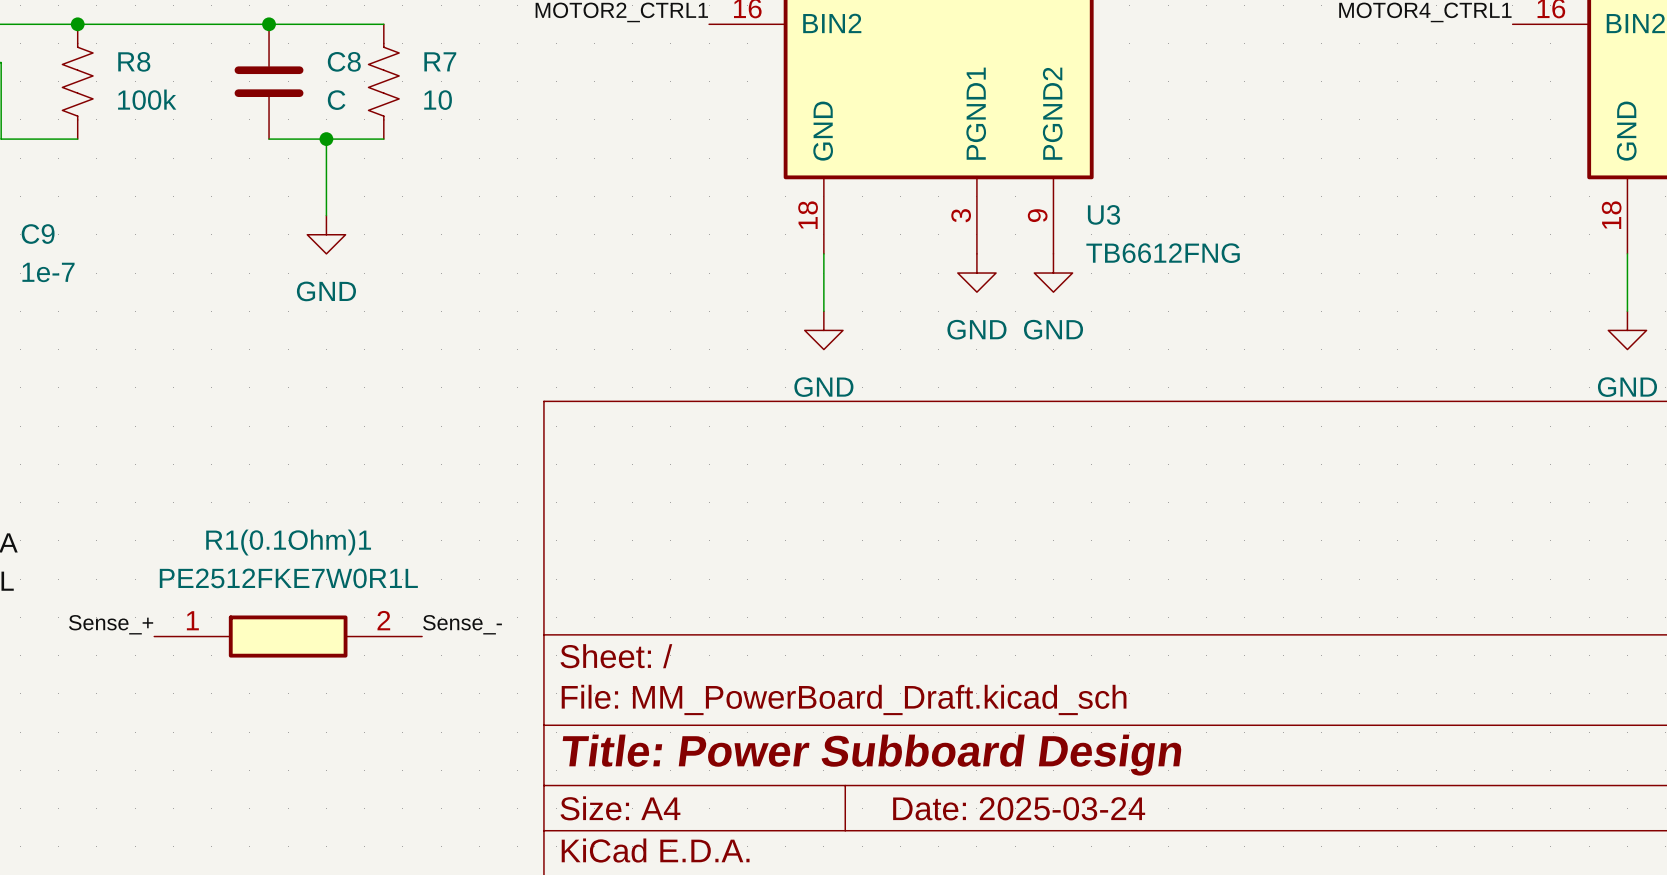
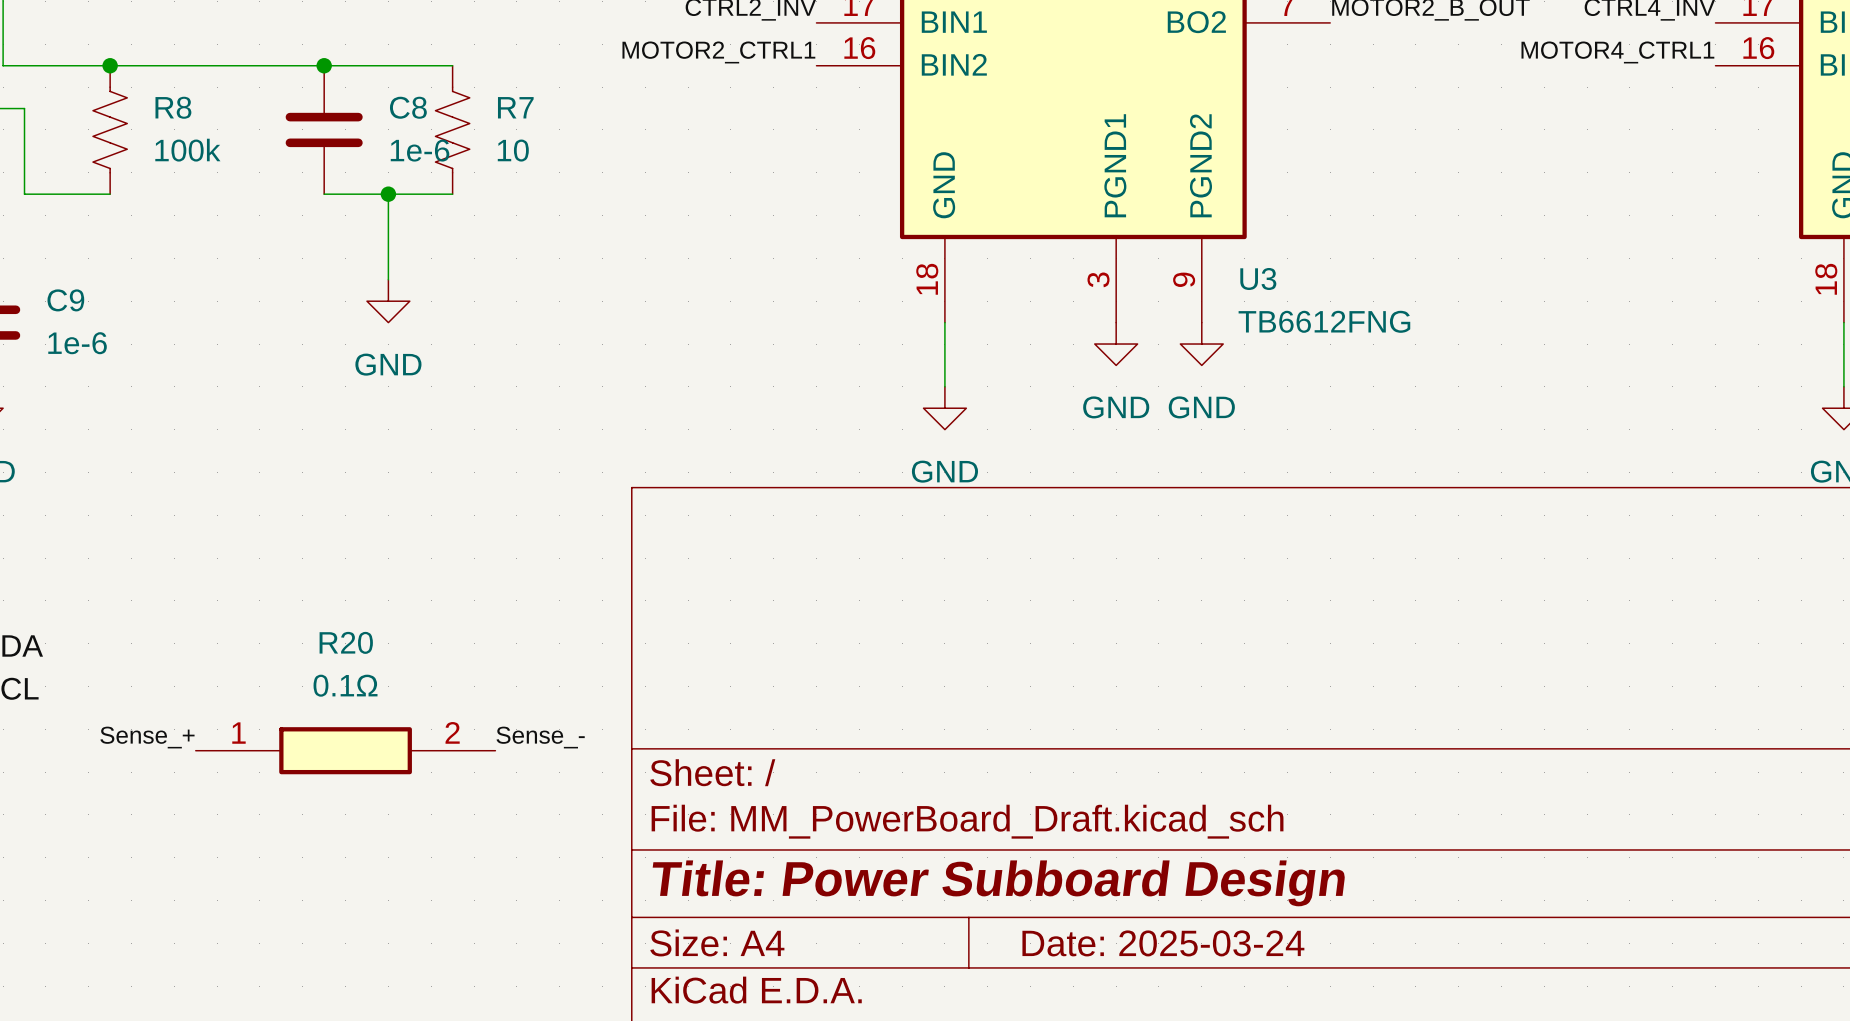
C8 value: C (336, 100) -> 1e-6 (420, 150)
C9 value: 1e-7 (48, 272) -> 1e-6 (77, 343)
R1(0.1Ohm)1 name: R1(0.1Ohm)1 (288, 542) -> R20 (346, 642)
R1(0.1Ohm)1 value: PE2512FKE7W0R1L (288, 578) -> 0.1Ω (345, 685)

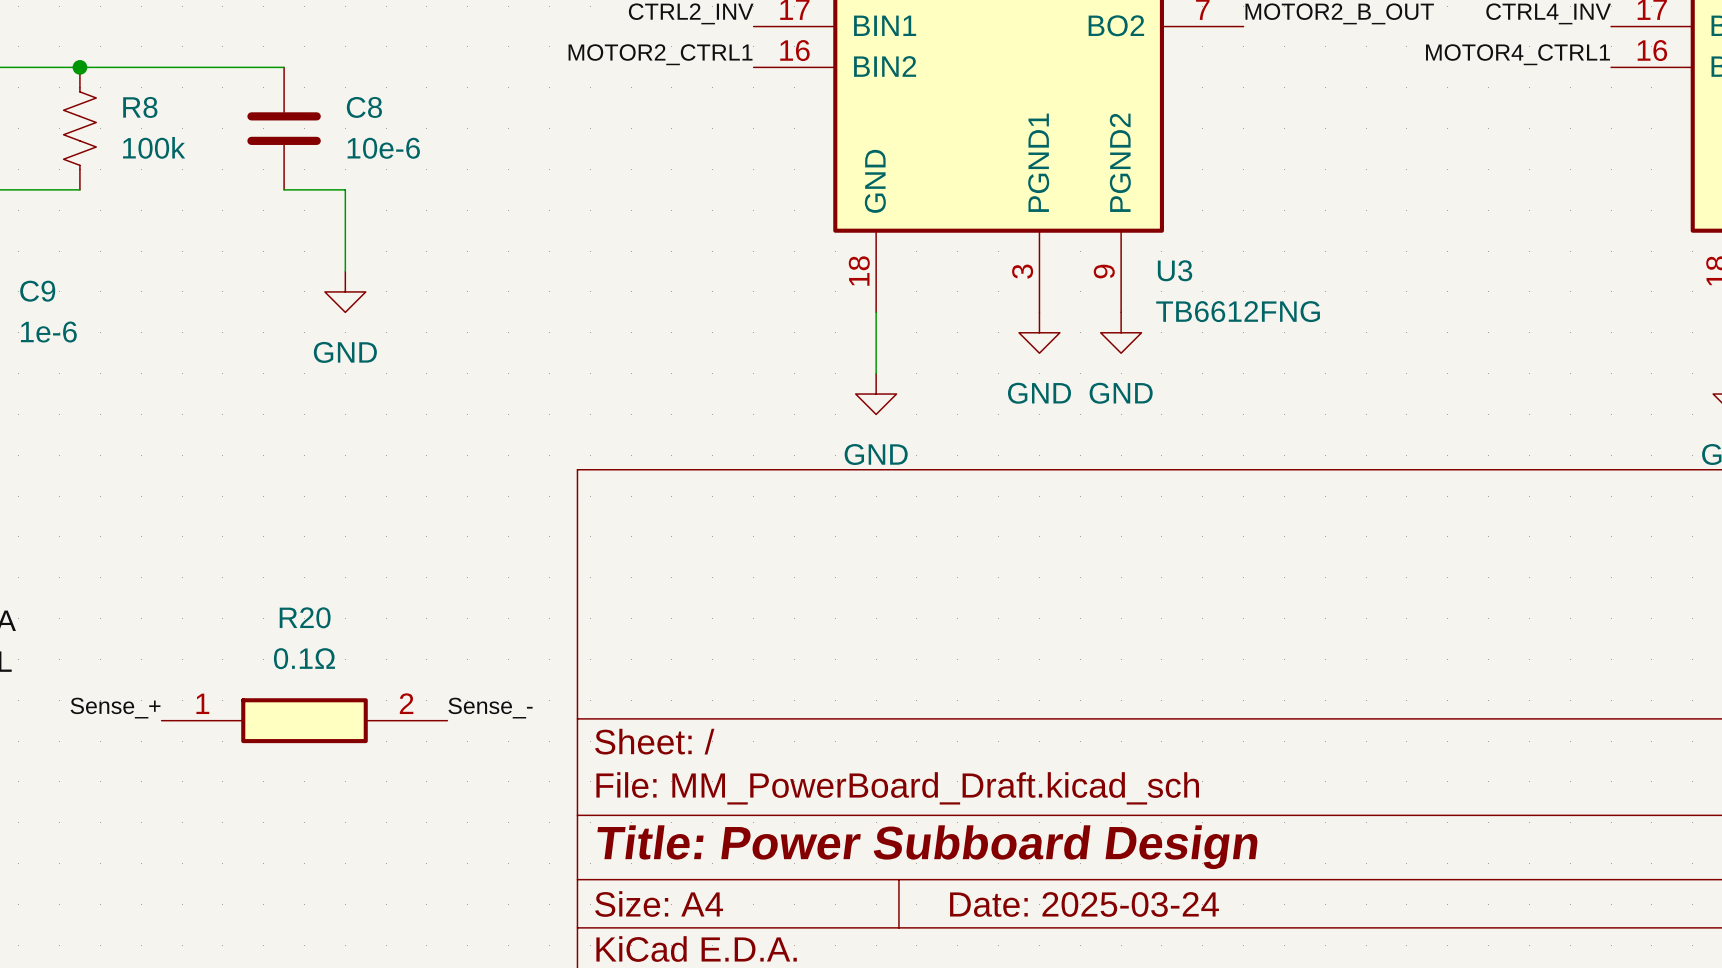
wire: (324, 65) (452, 65) -> none
junction: (324, 65) -> none
R7: 10 (452, 129) -> none
C8 value: 1e-6 (420, 150) -> 10e-6 (383, 148)
wire: (388, 194) (452, 194) -> none
junction: (388, 194) -> none

